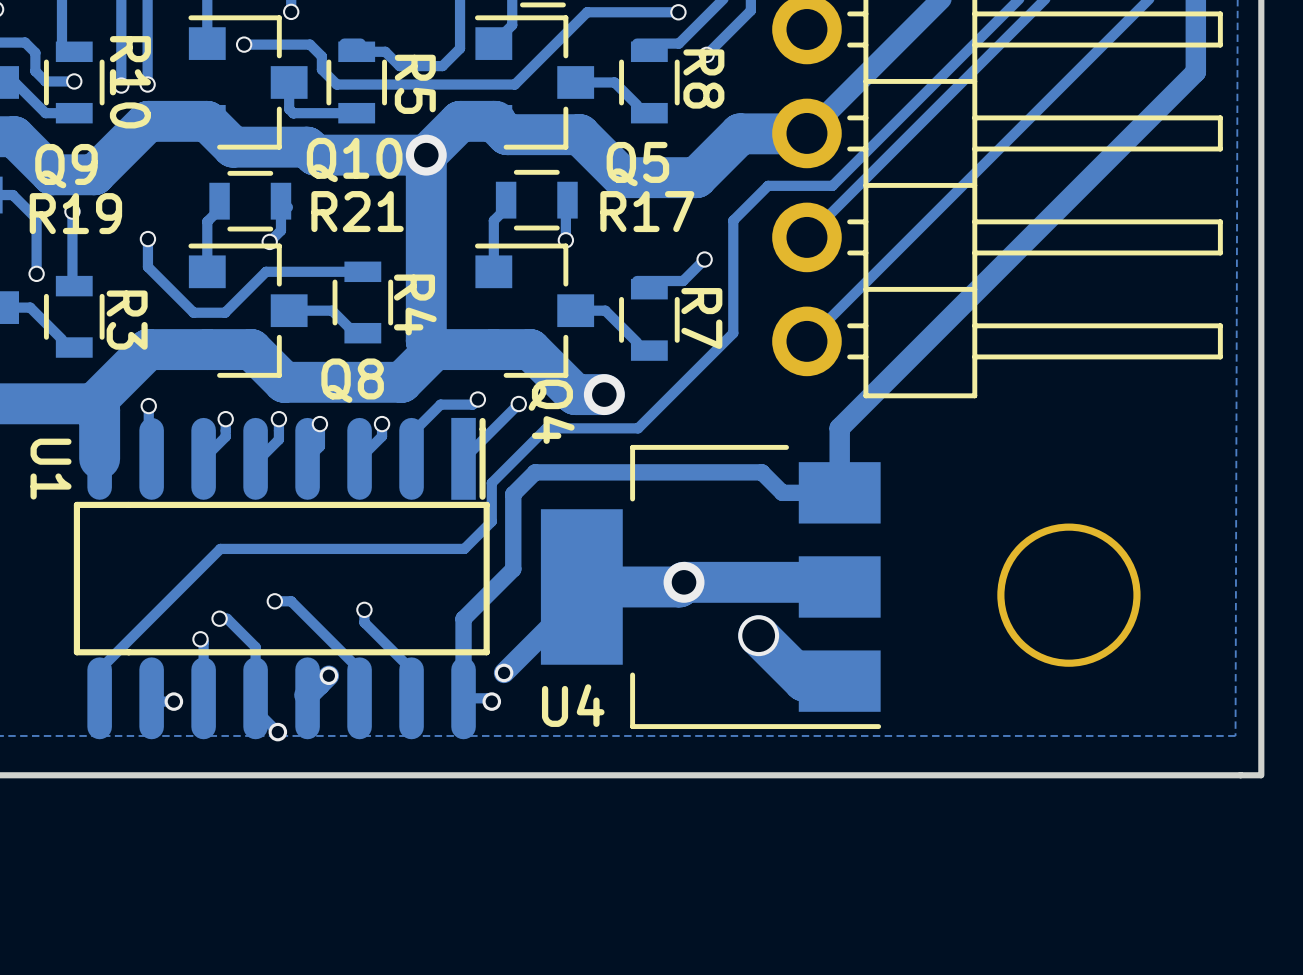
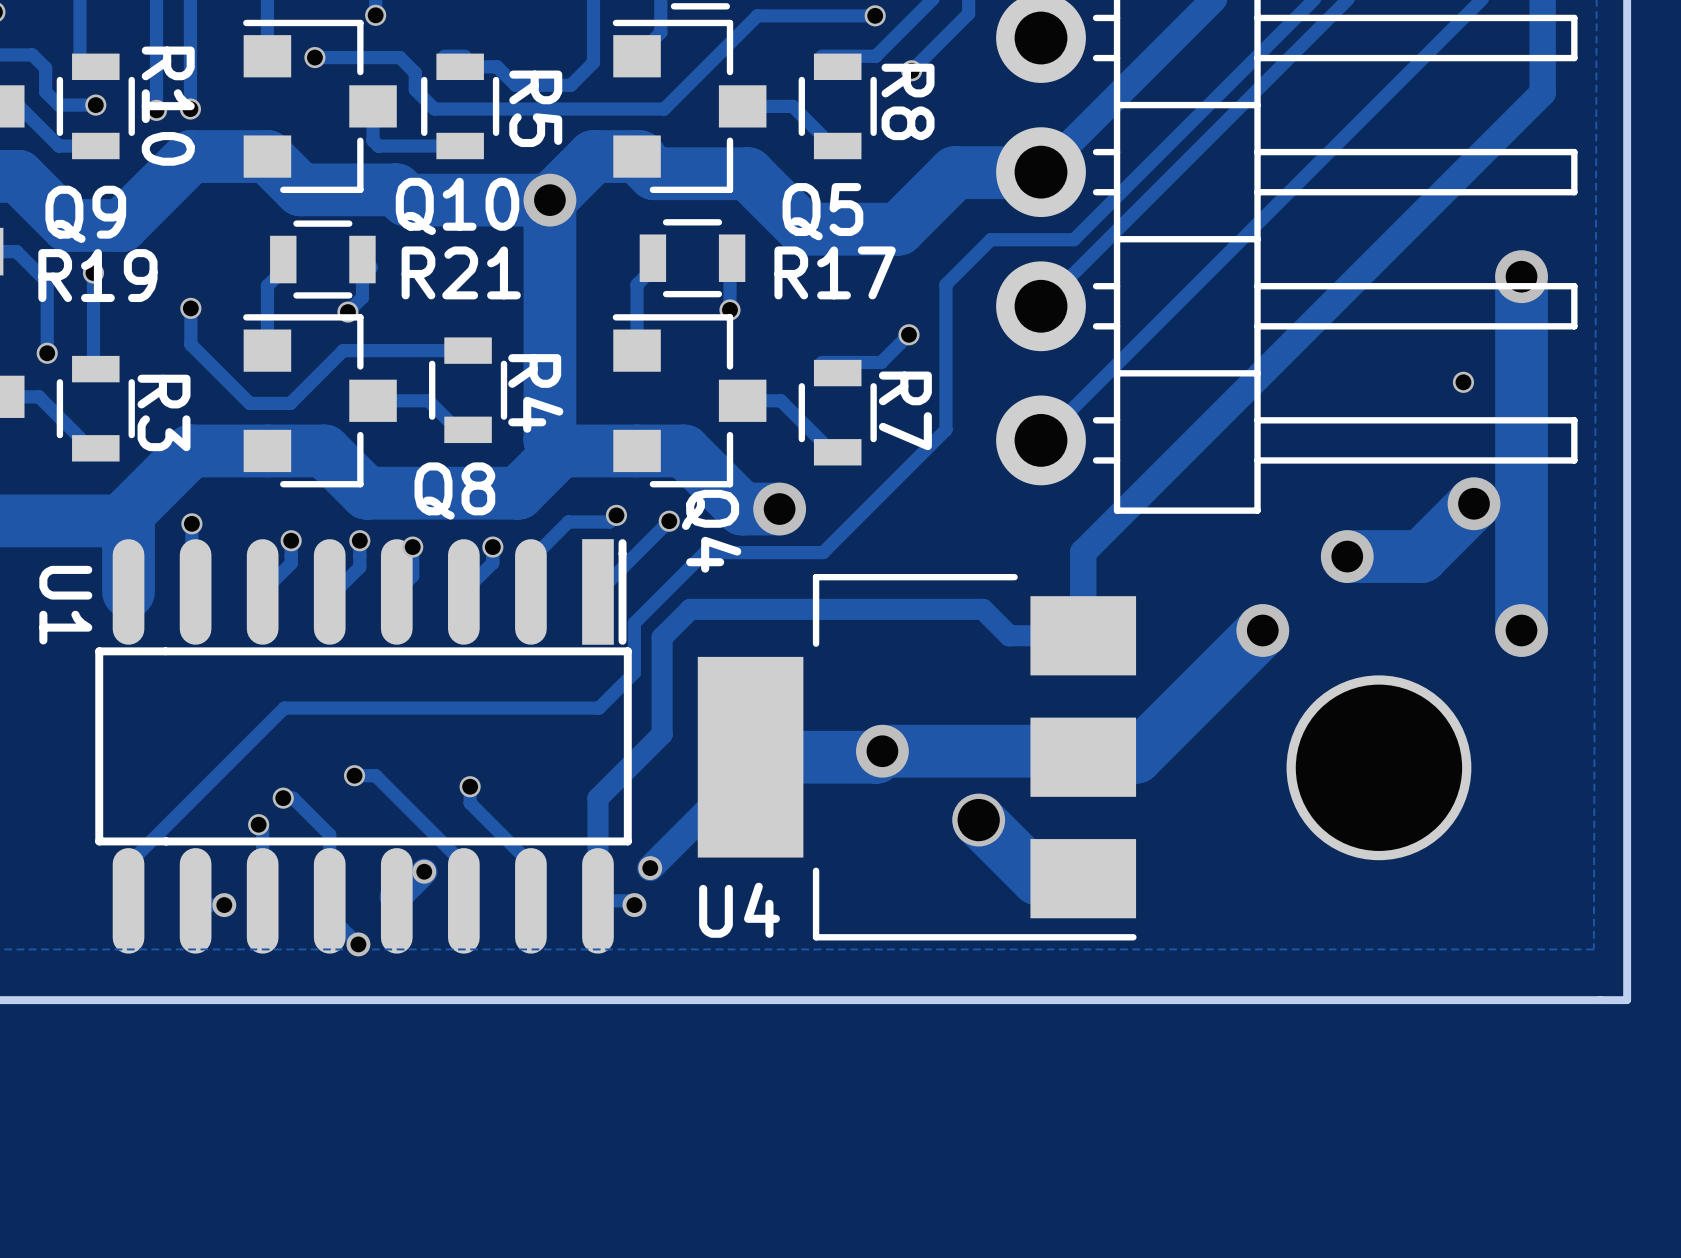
track: none -> (1521, 276) (1521, 630)
via: none -> (1521, 276)
via: none -> (1463, 382)
track: none -> (1474, 503) (1421, 556) (1347, 556)
via: none -> (1474, 503)
via: none -> (1347, 556)
track: none -> (1262, 630) (1136, 757) (1083, 757)
via: none -> (1262, 630)
via: none -> (1521, 630)

